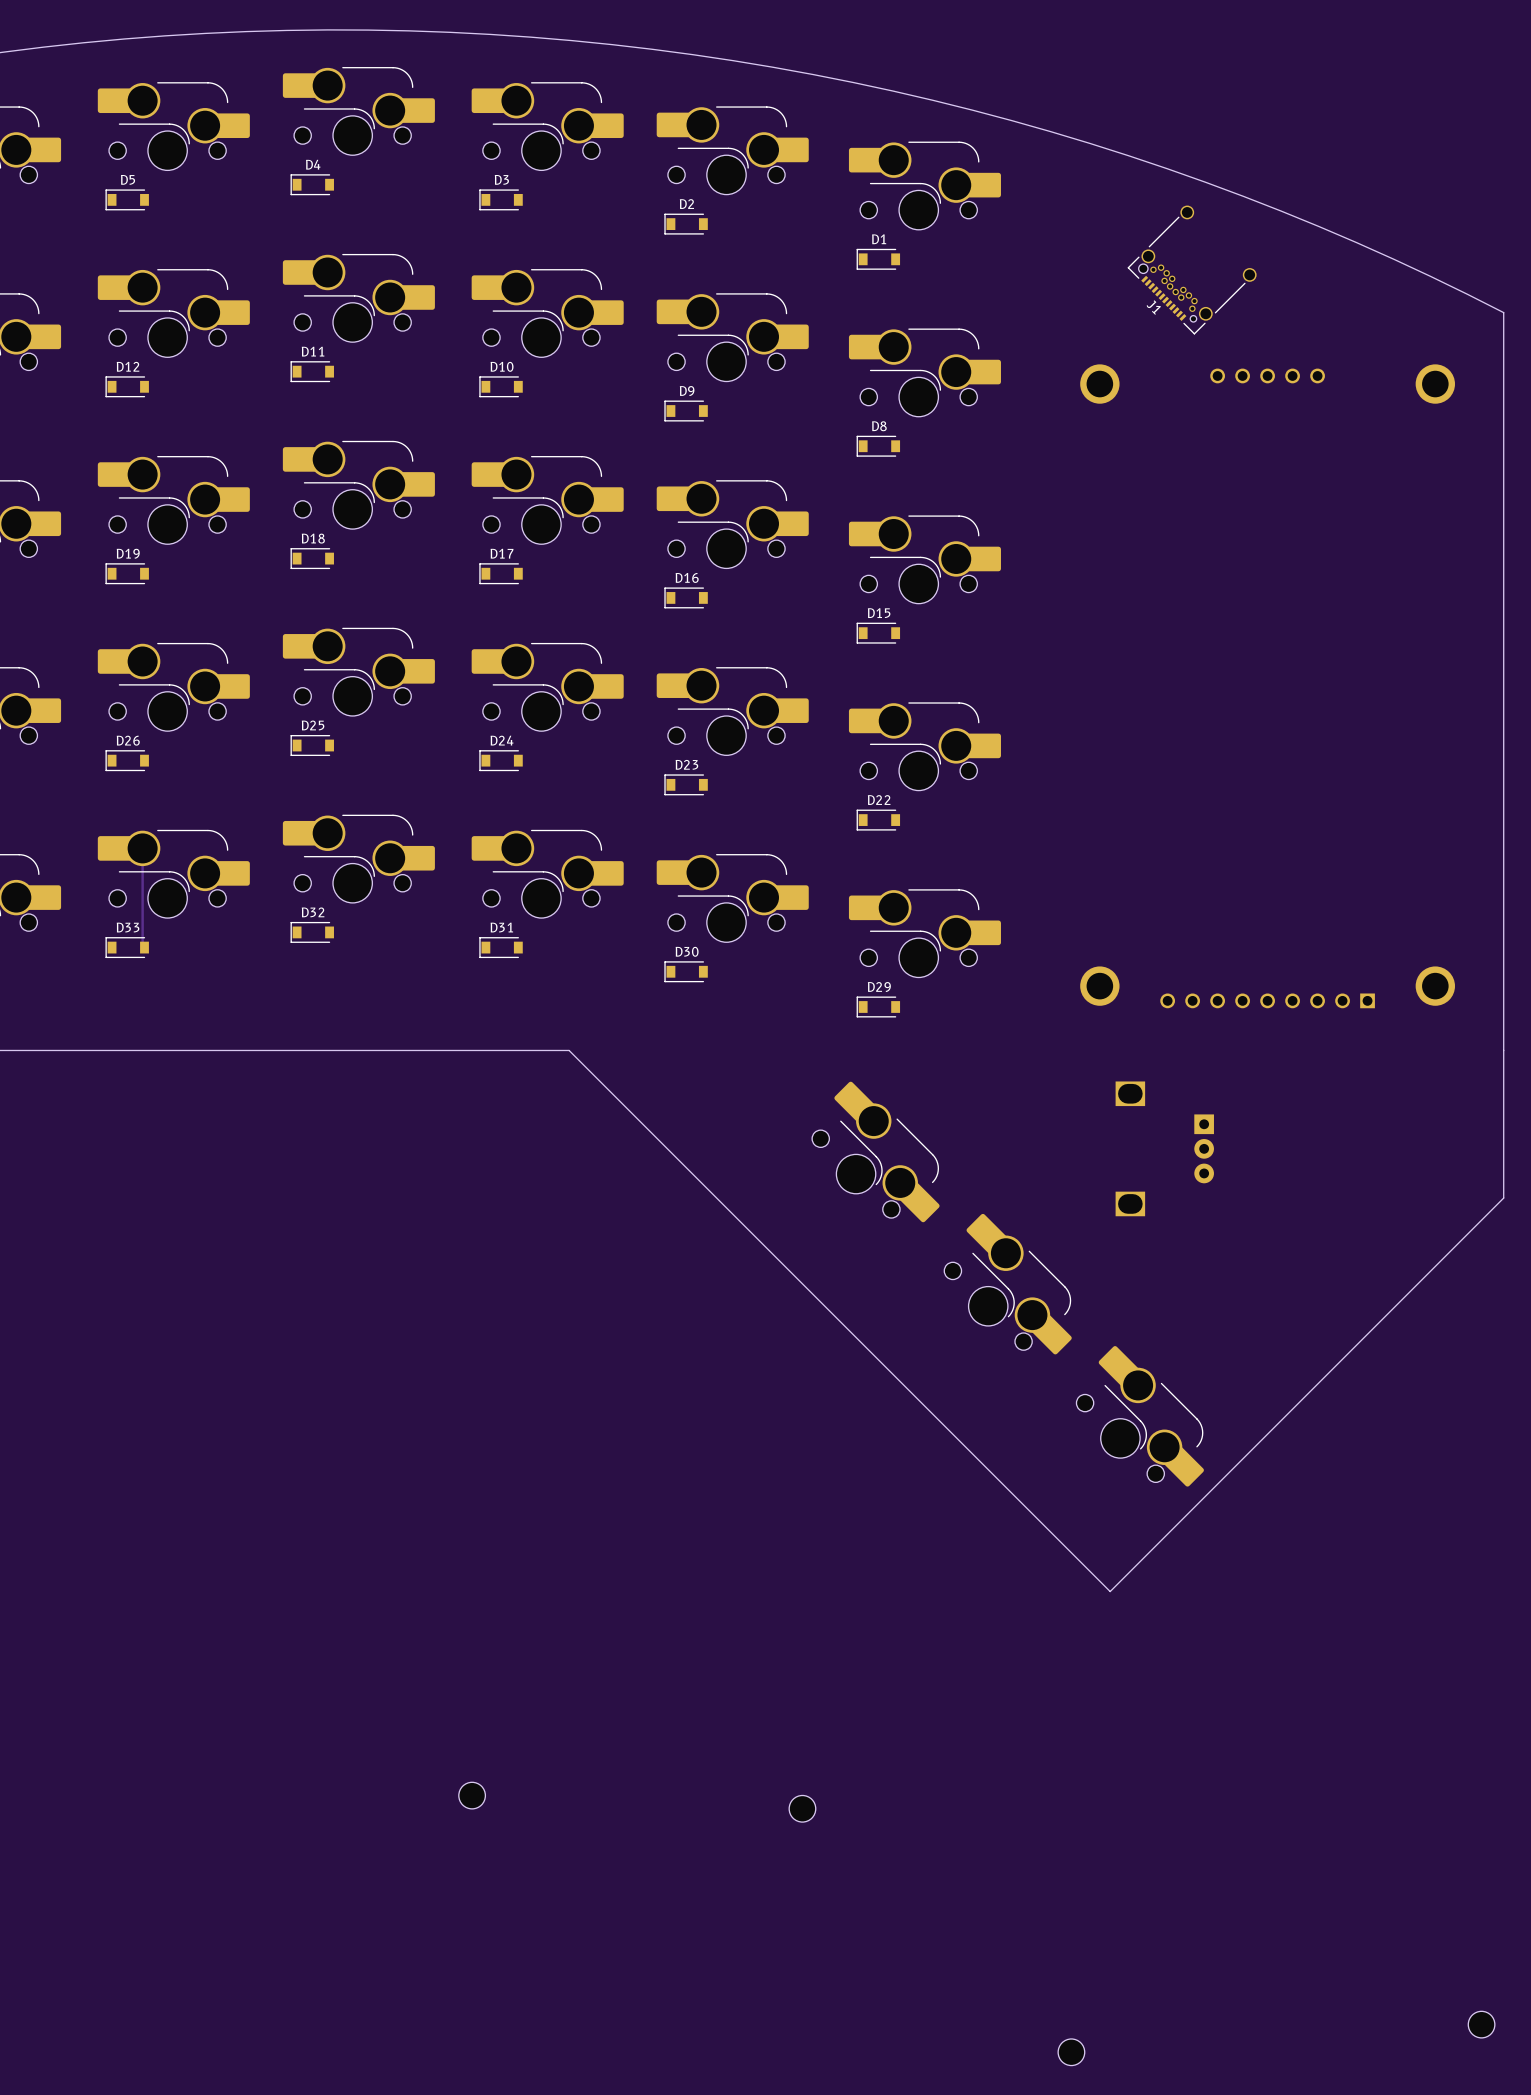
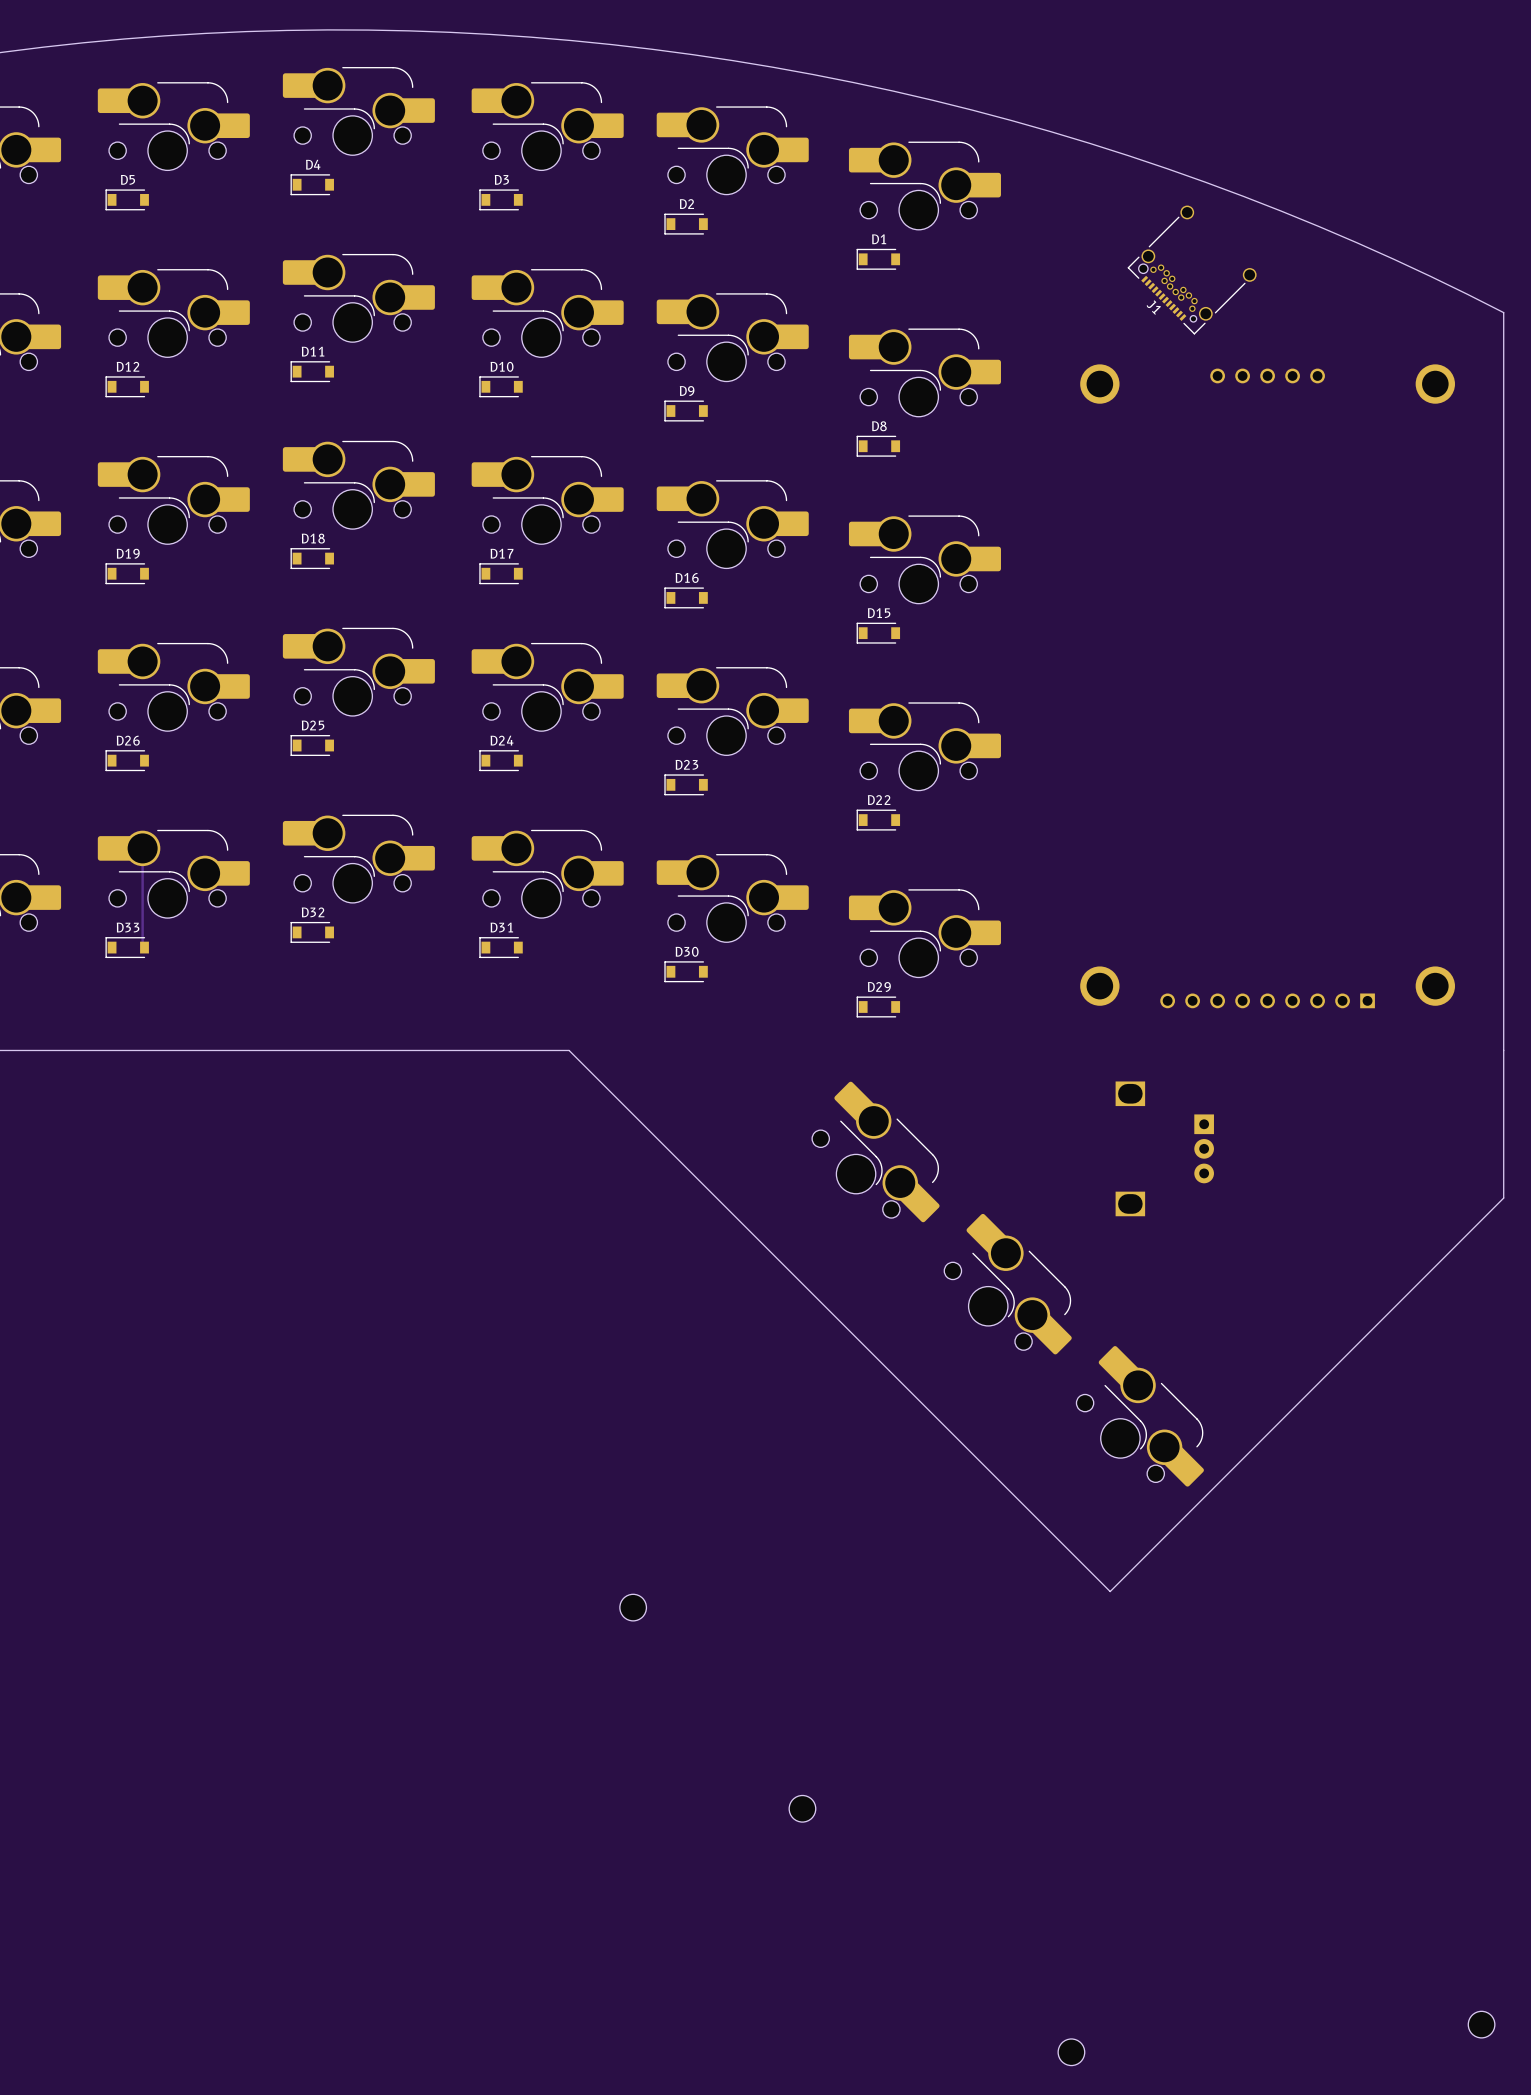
part: none -> (633, 1607)
part: (472, 1795) -> none

